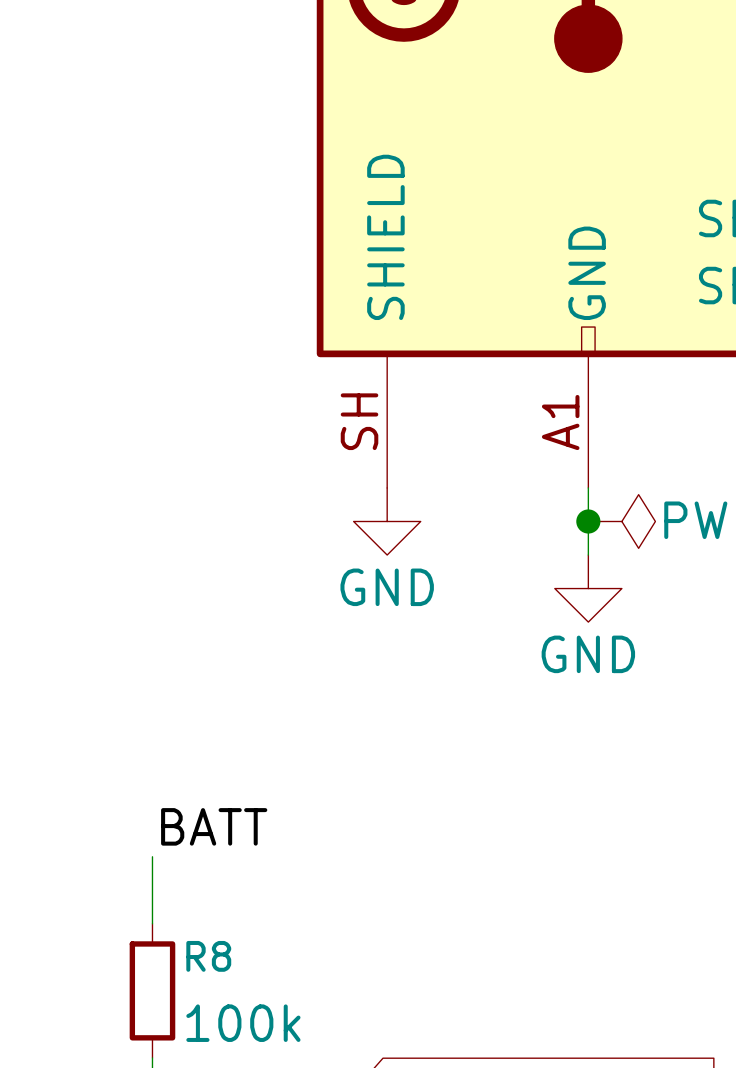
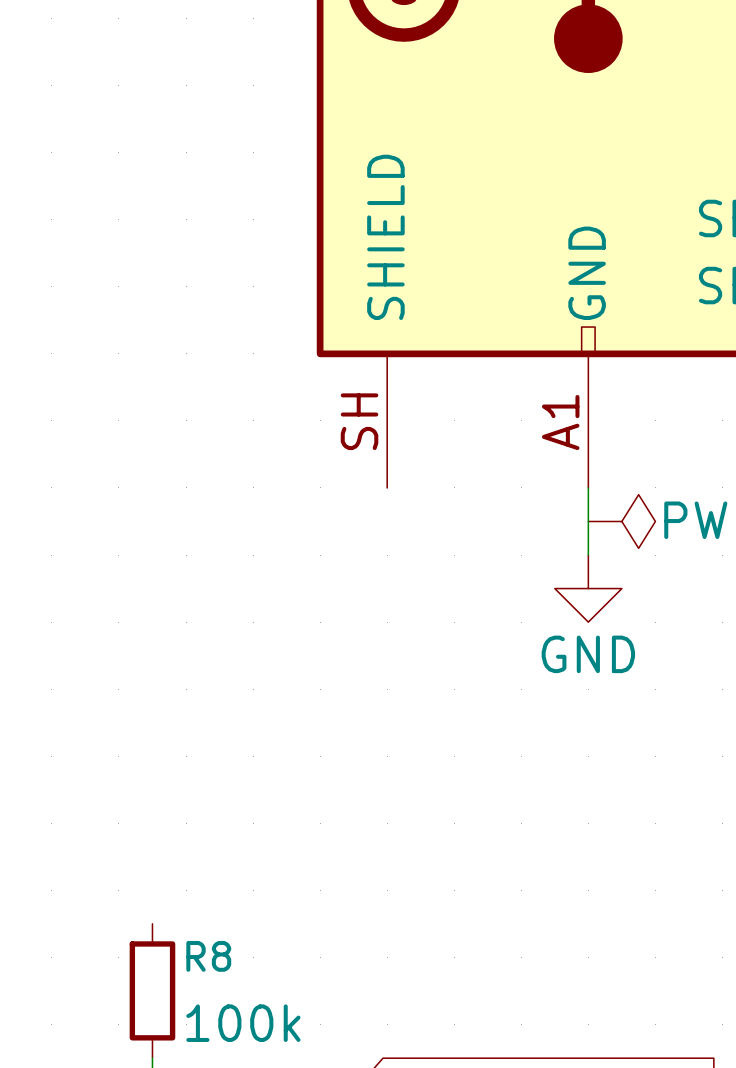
power symbol: GND (387, 521) -> none
junction: (588, 521) -> none
label: BATT (214, 826) -> none
wire: (152, 856) (152, 923) -> none

